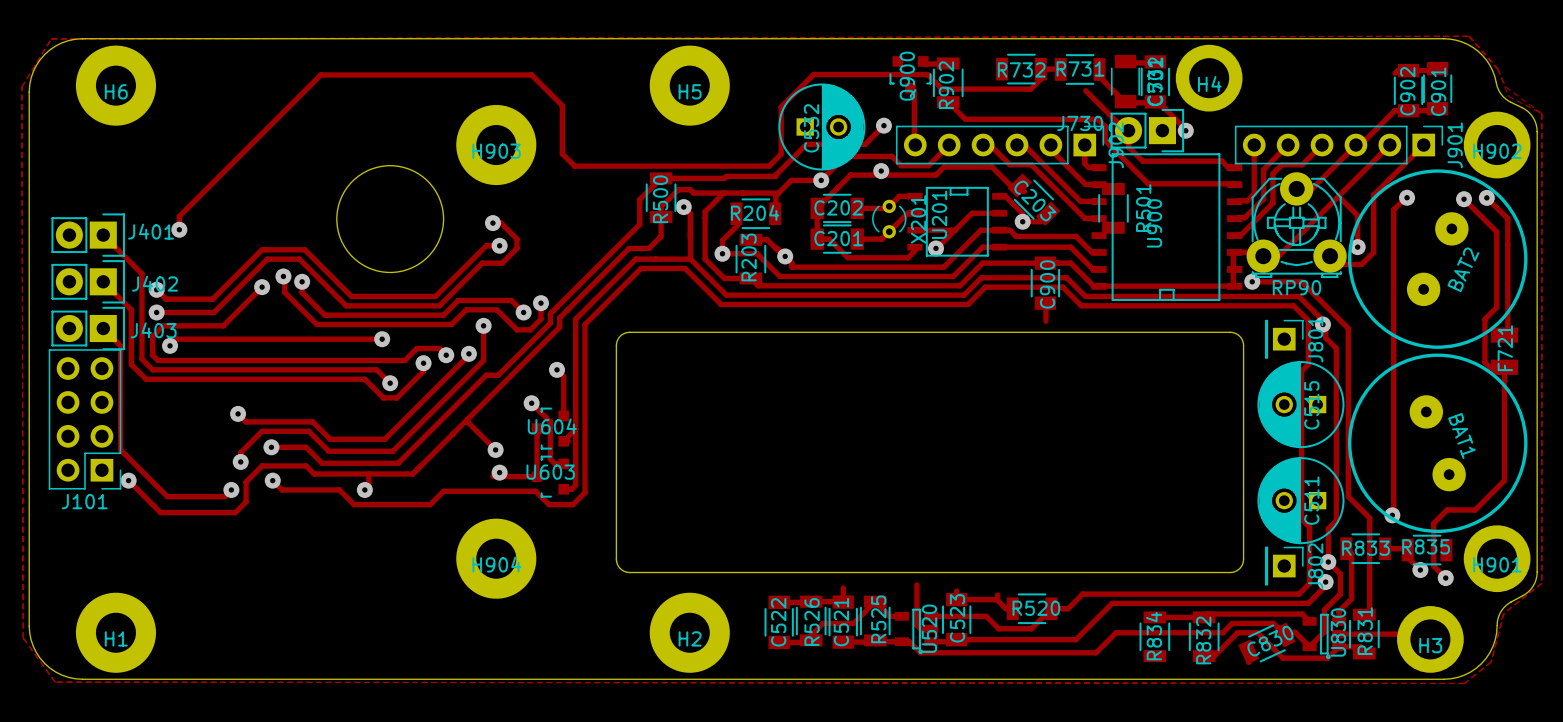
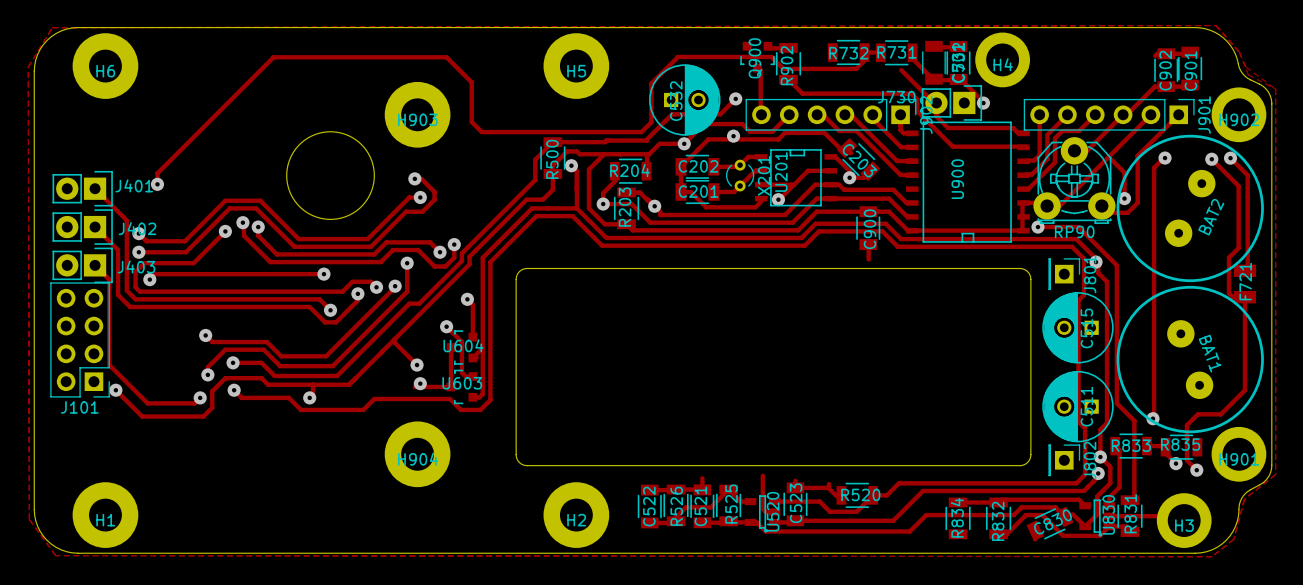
R501: (1113, 208) -> none

